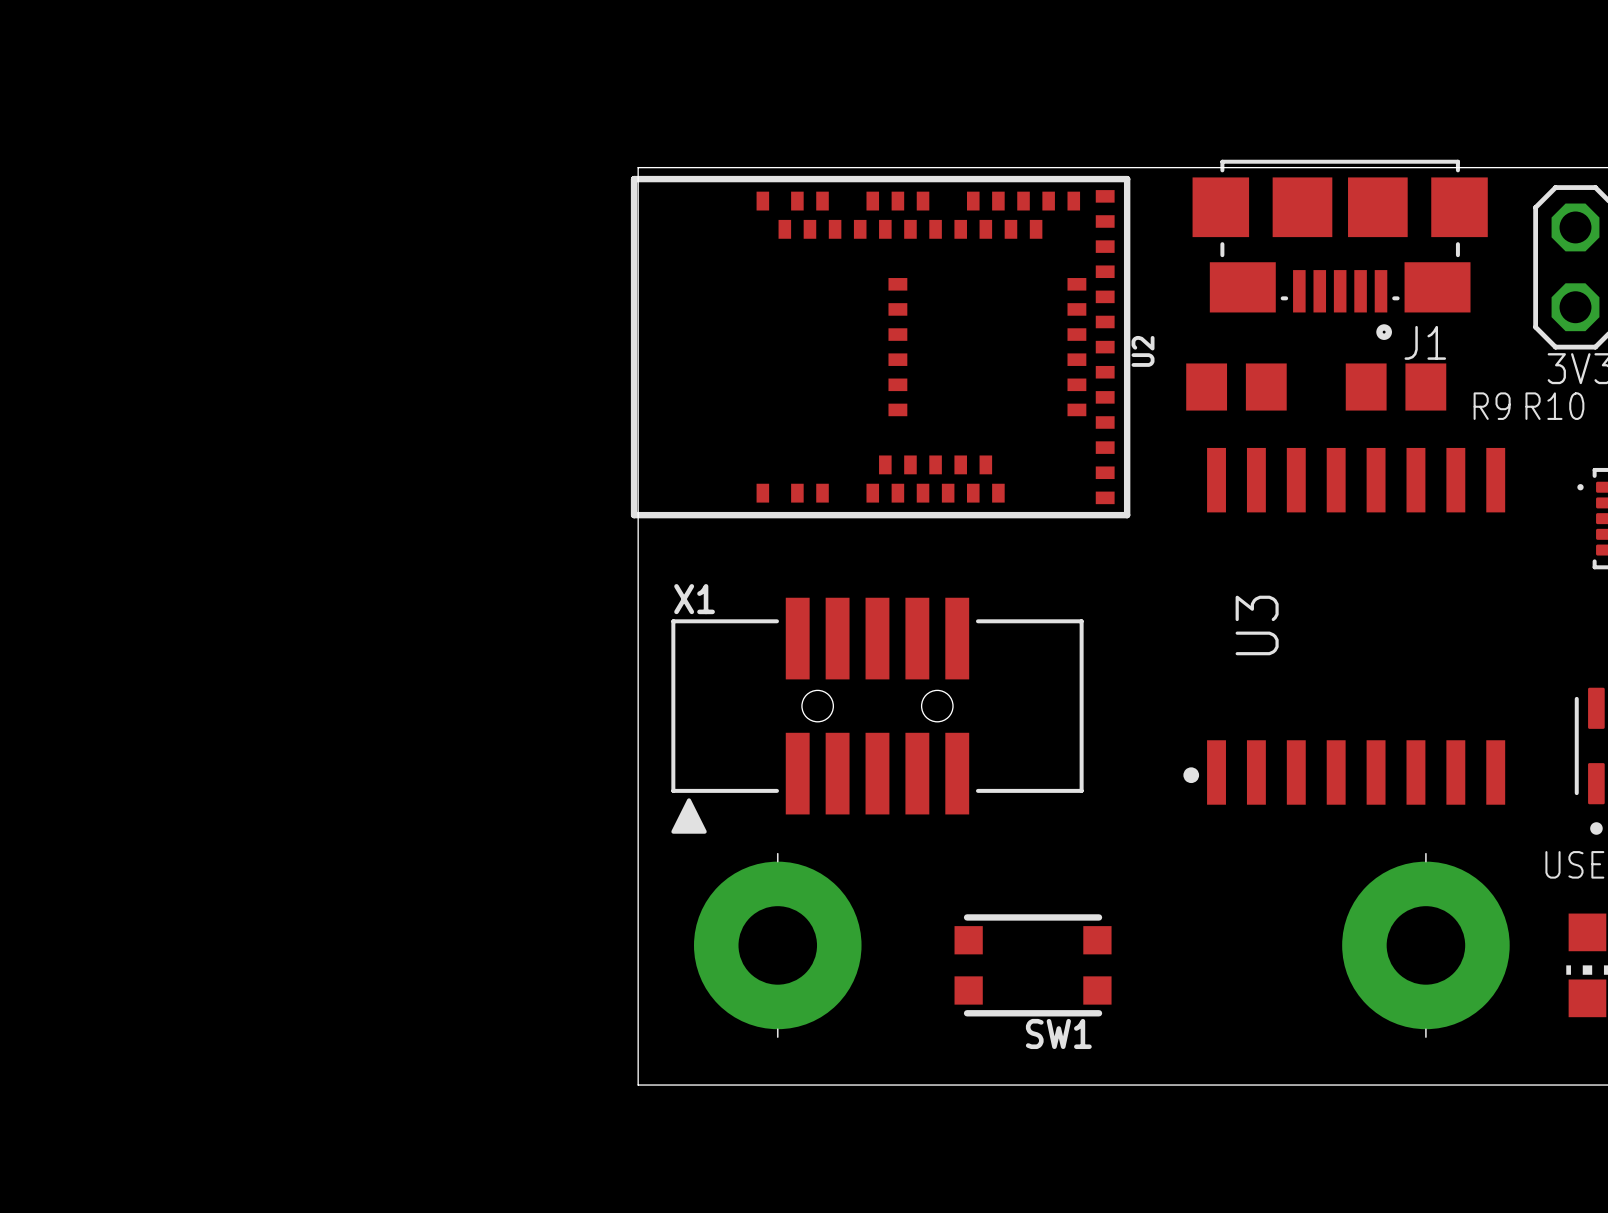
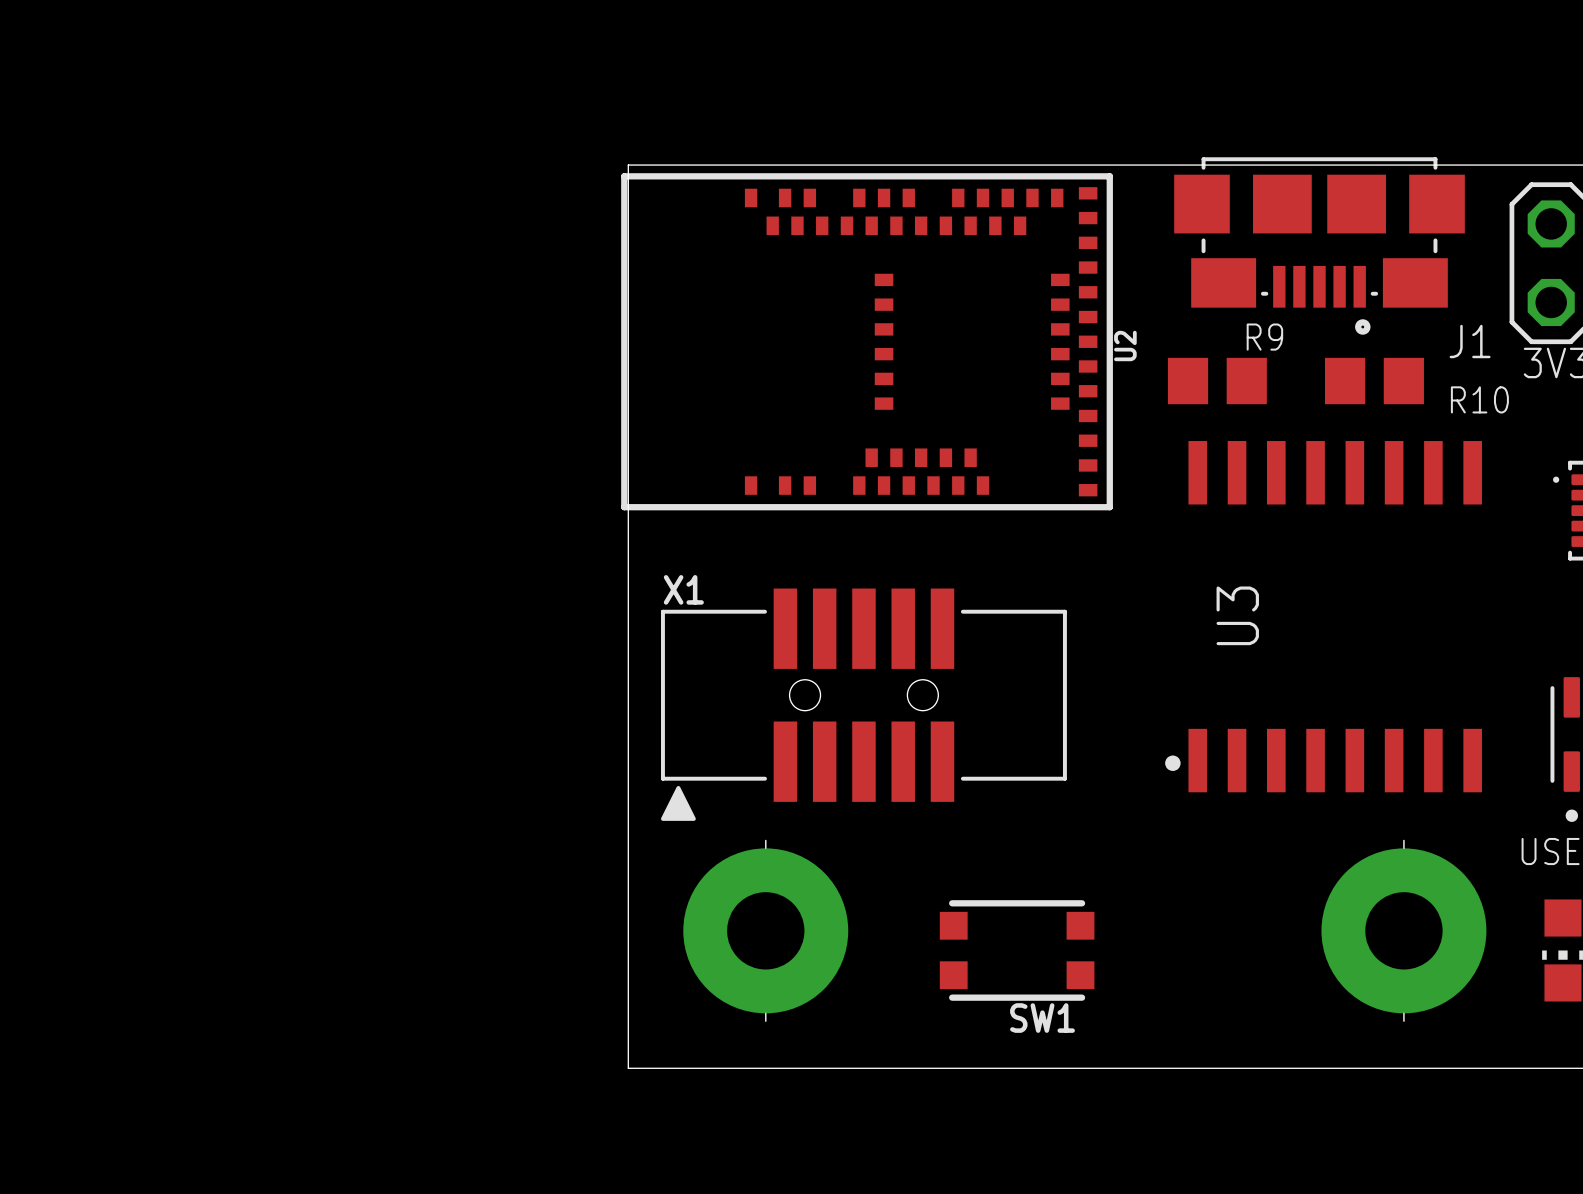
J1 name position: J1 (1425, 342) -> J1 (1470, 341)
R9 name position: R9 (1492, 406) -> R9 (1264, 337)
R10 name position: R10 (1554, 406) -> R10 (1479, 399)

